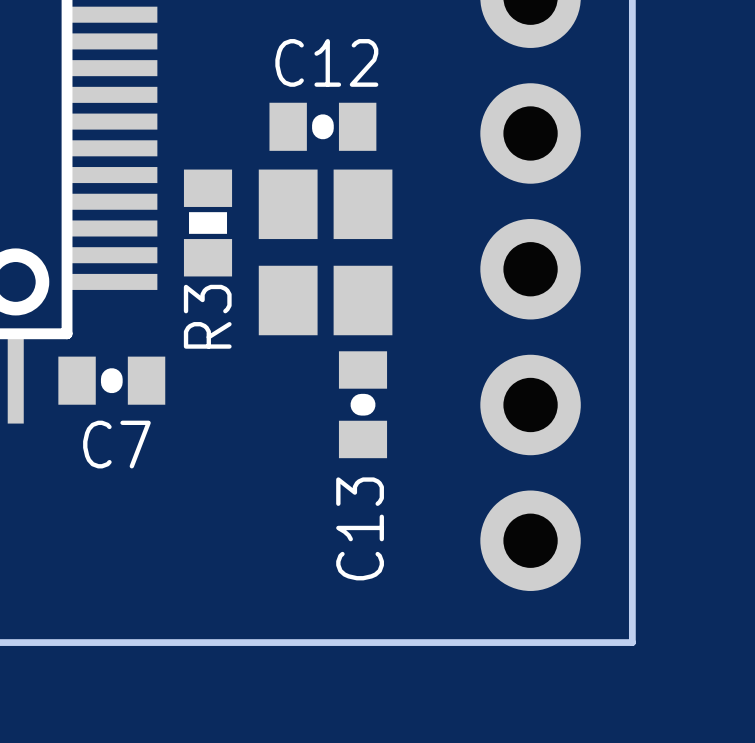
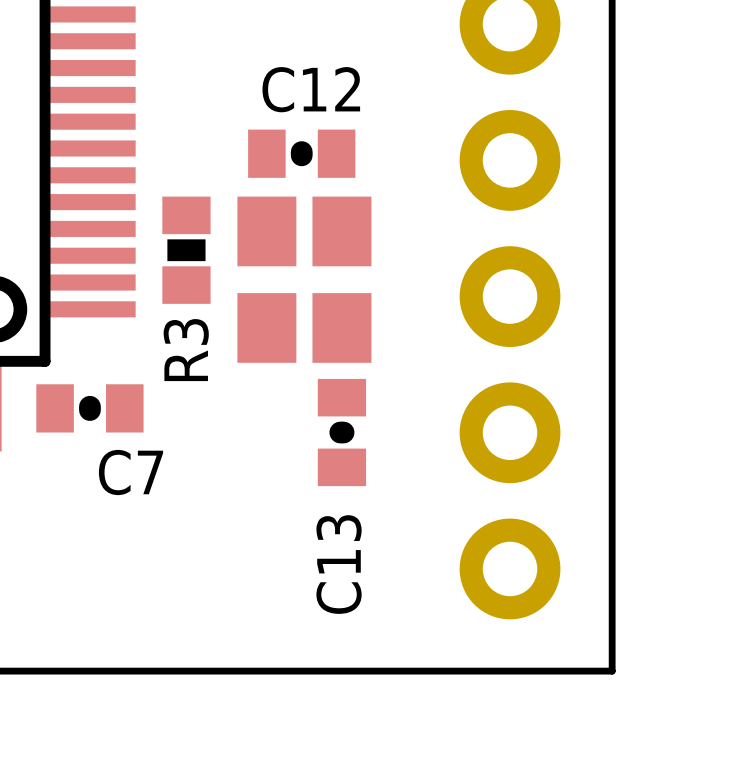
C7 name position: C7 (116, 444) -> C7 (131, 472)

